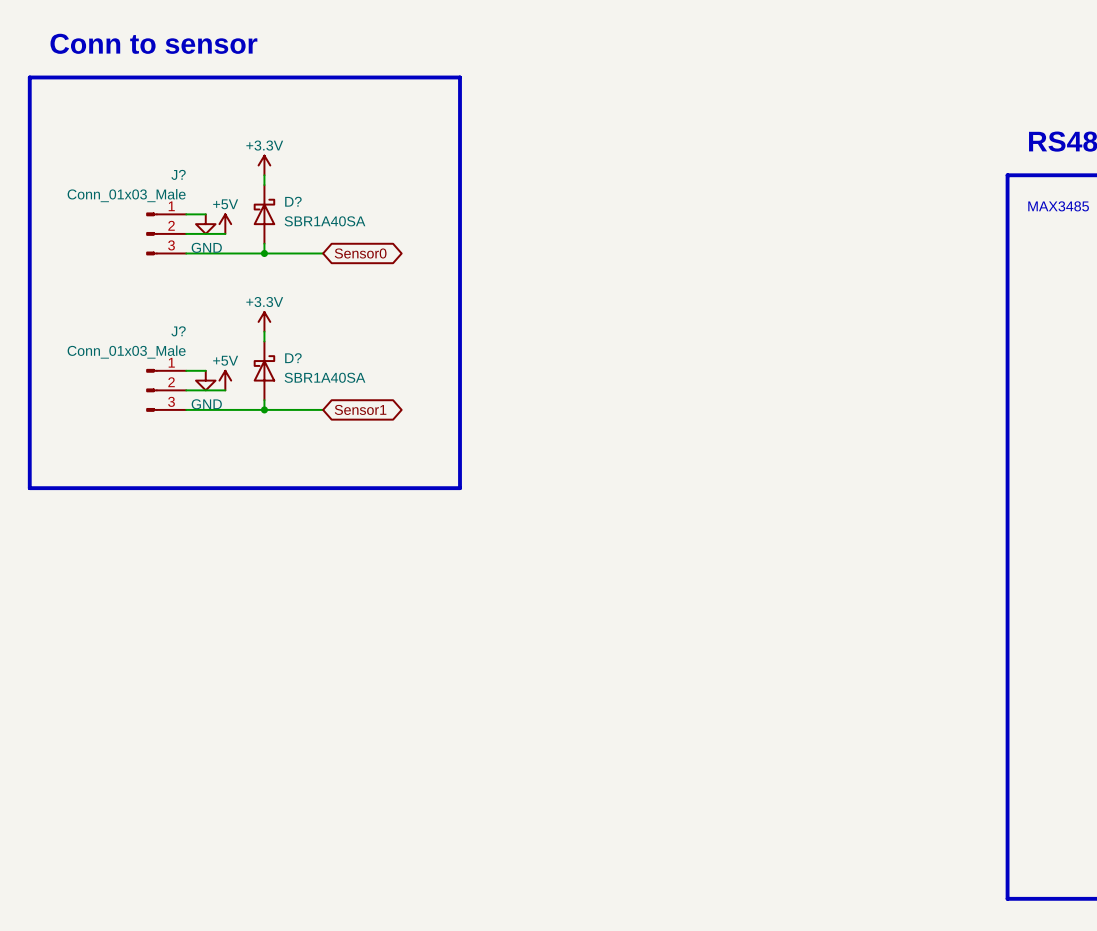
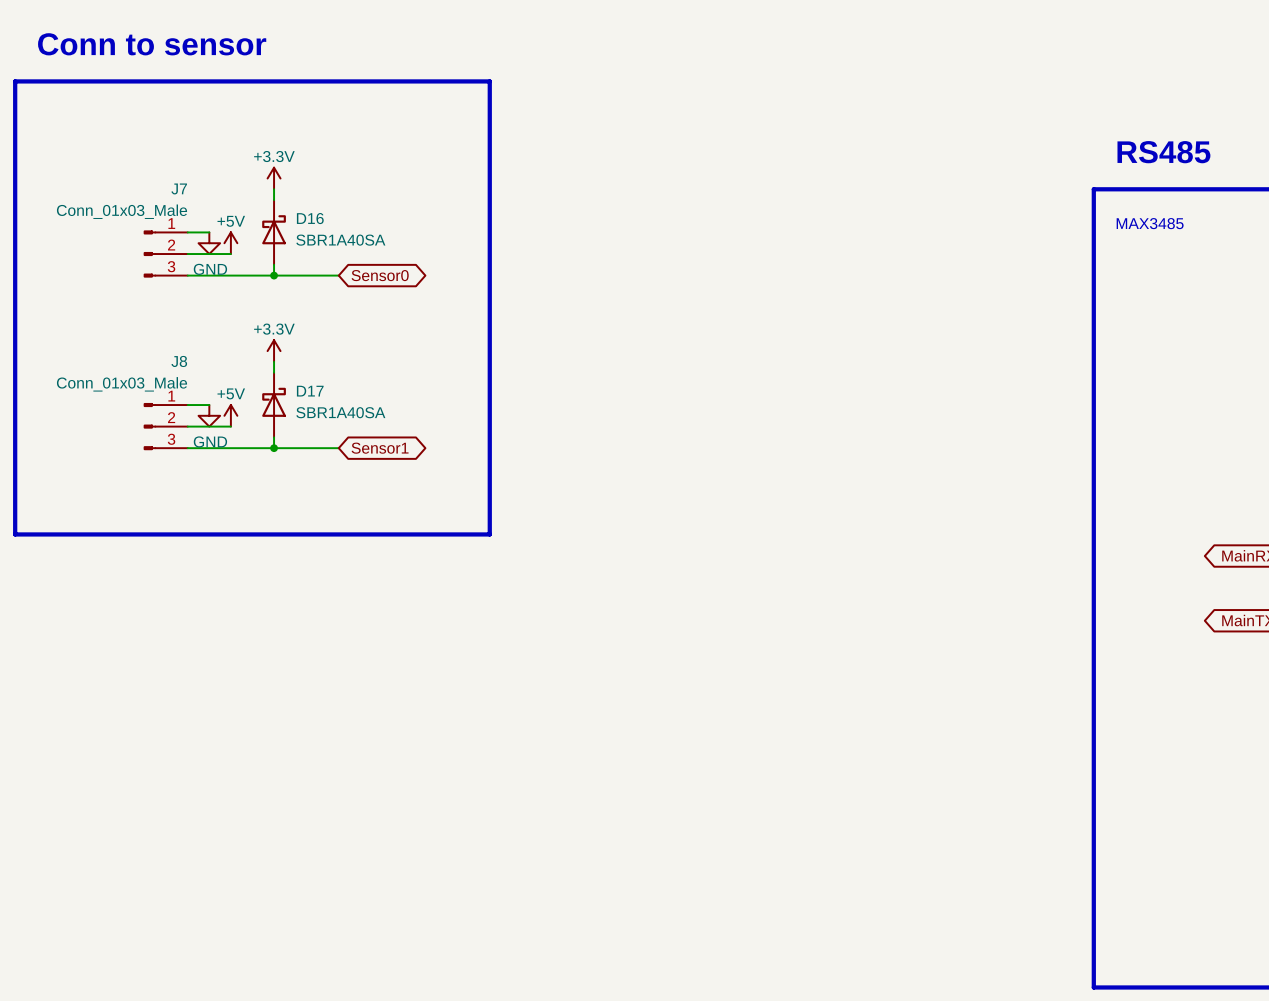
J? name: J? (178, 174) -> J7 (179, 188)
D? name: D? (293, 201) -> D16 (310, 218)
J? name: J? (178, 331) -> J8 (179, 361)
D? name: D? (293, 358) -> D17 (310, 391)

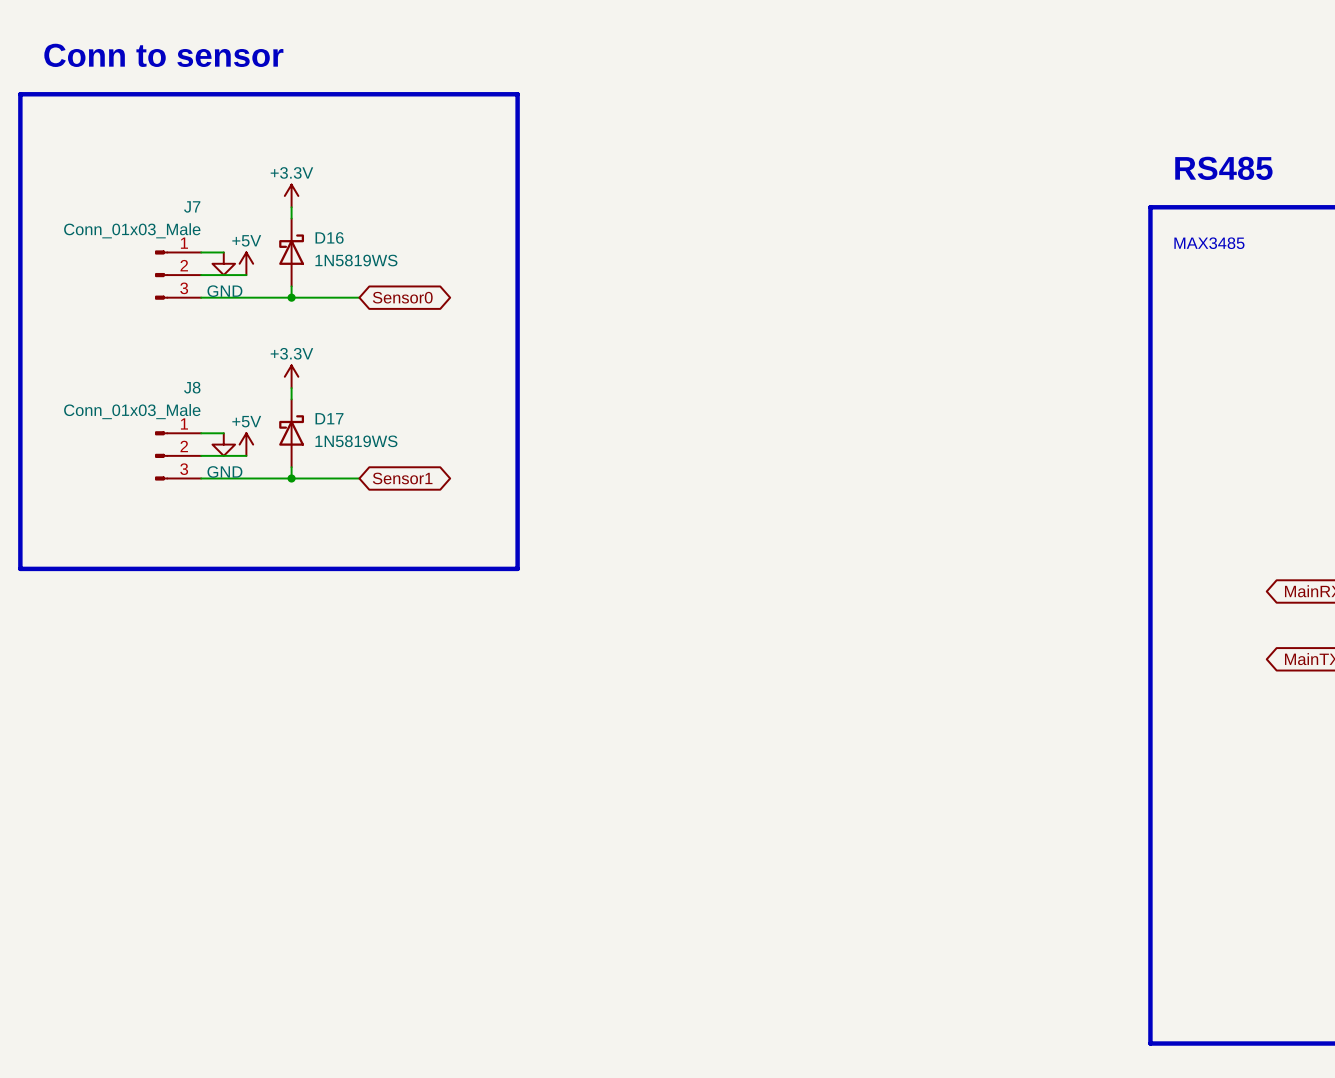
D16 value: SBR1A40SA (340, 240) -> 1N5819WS (356, 260)
D17 value: SBR1A40SA (340, 412) -> 1N5819WS (356, 441)

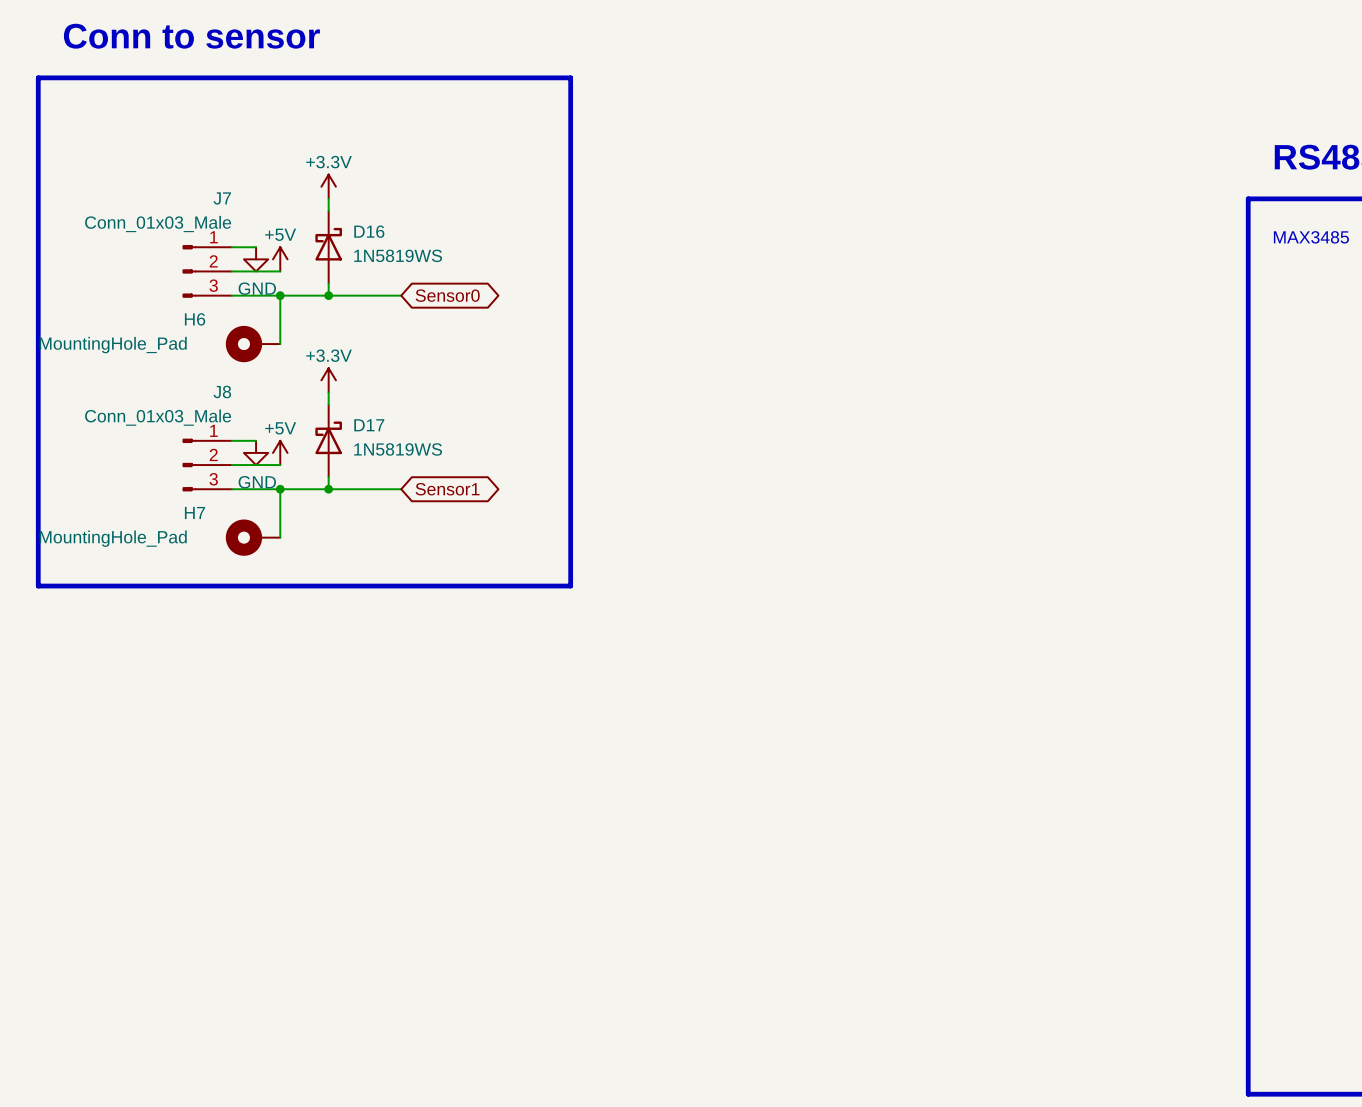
wire: none -> (280, 295) (280, 344)
junction: none -> (280, 295)
H6: none -> MountingHole_Pad (253, 344)
wire: none -> (280, 489) (280, 537)
junction: none -> (280, 489)
H7: none -> MountingHole_Pad (253, 537)

